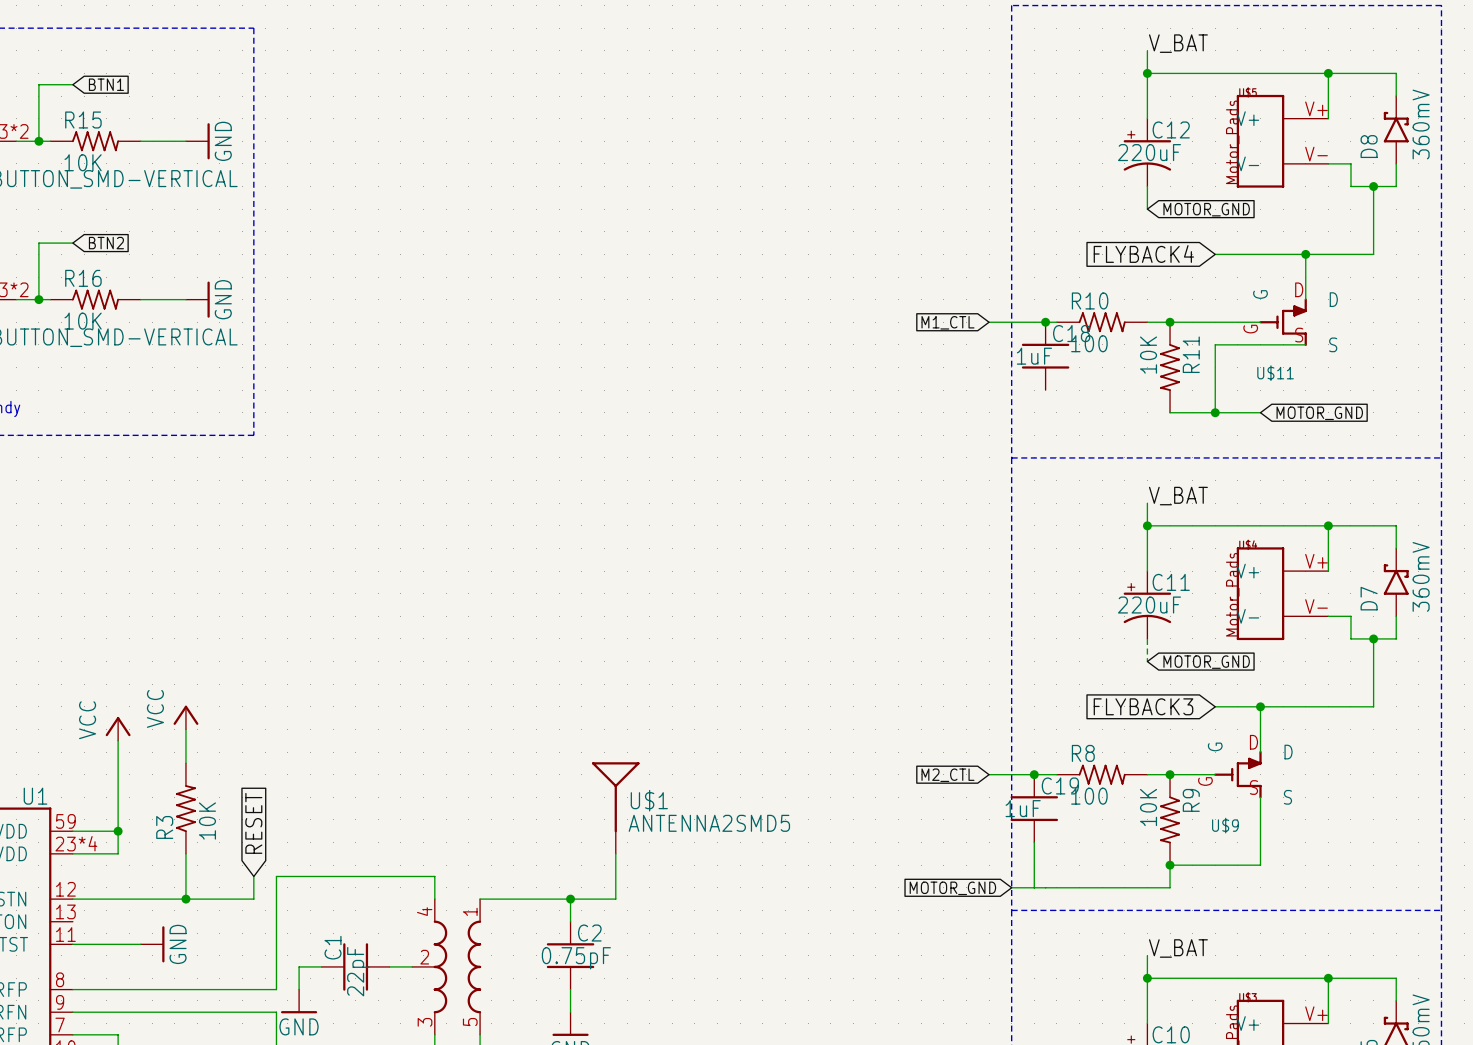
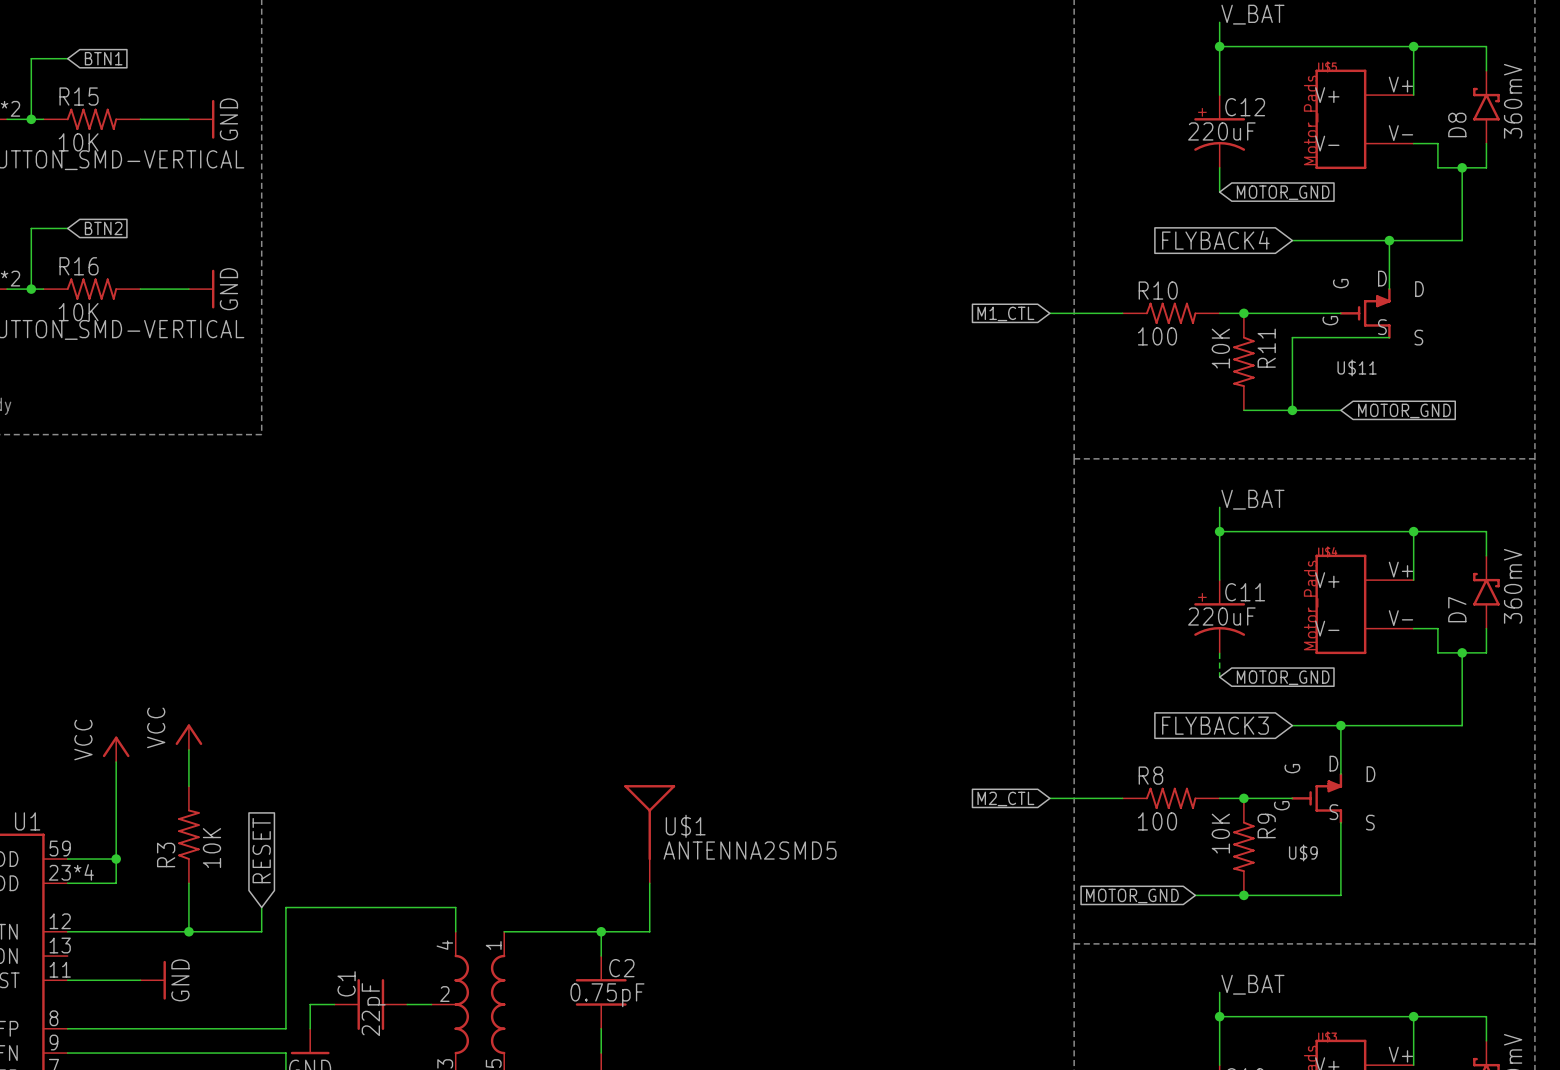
junction: (1045, 322) -> none
C18: 1uF (1045, 356) -> none
junction: (1034, 774) -> none
C19: 1uF (1034, 808) -> none
wire: (1034, 842) (1034, 887) -> none
wire: (1170, 865) (1170, 887) (1011, 887) -> (1243, 895) (1195, 895)
global label position: MOTOR_GND (952, 888) -> MOTOR_GND (1132, 895)

